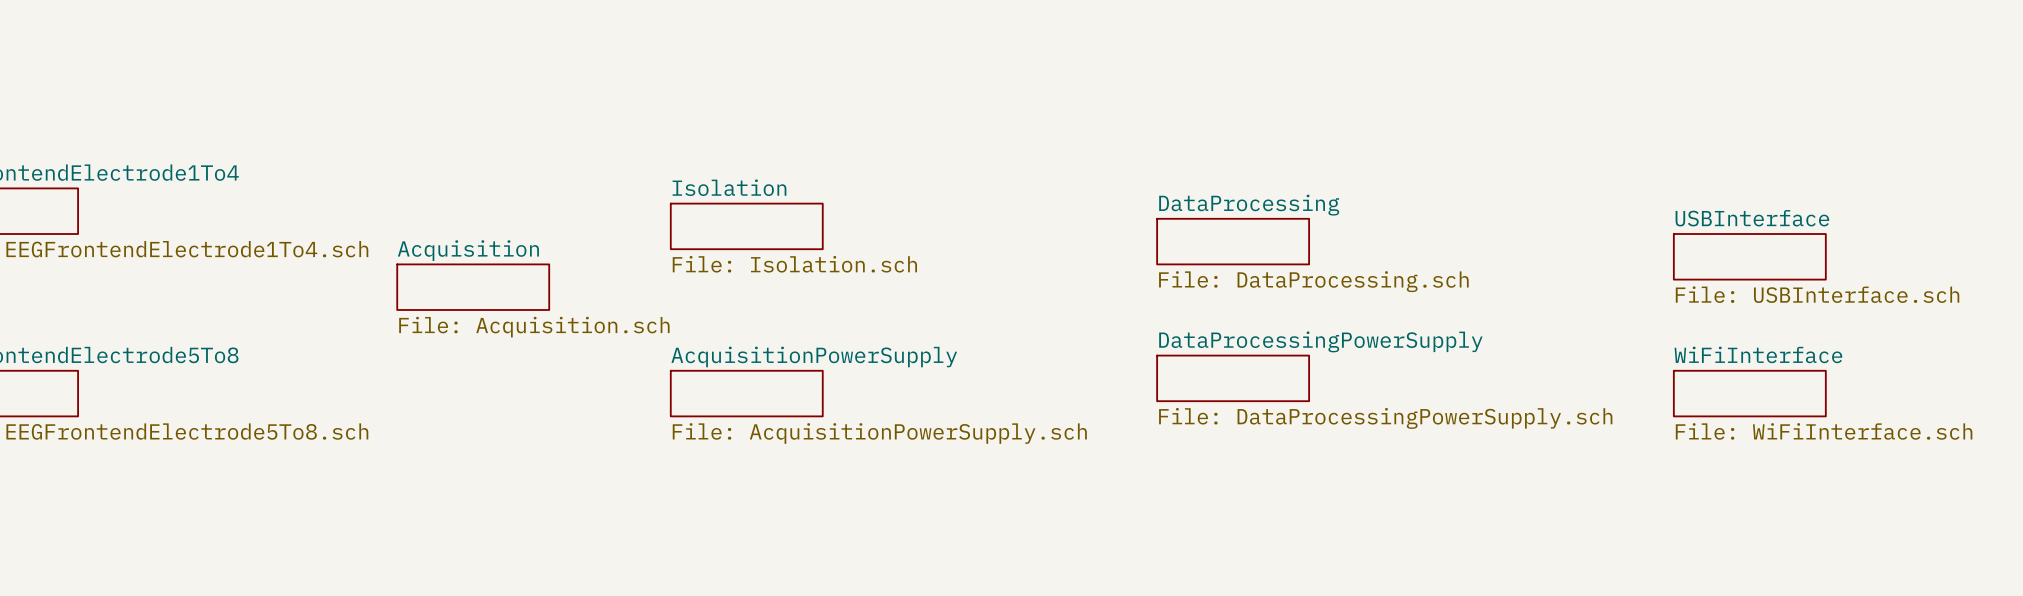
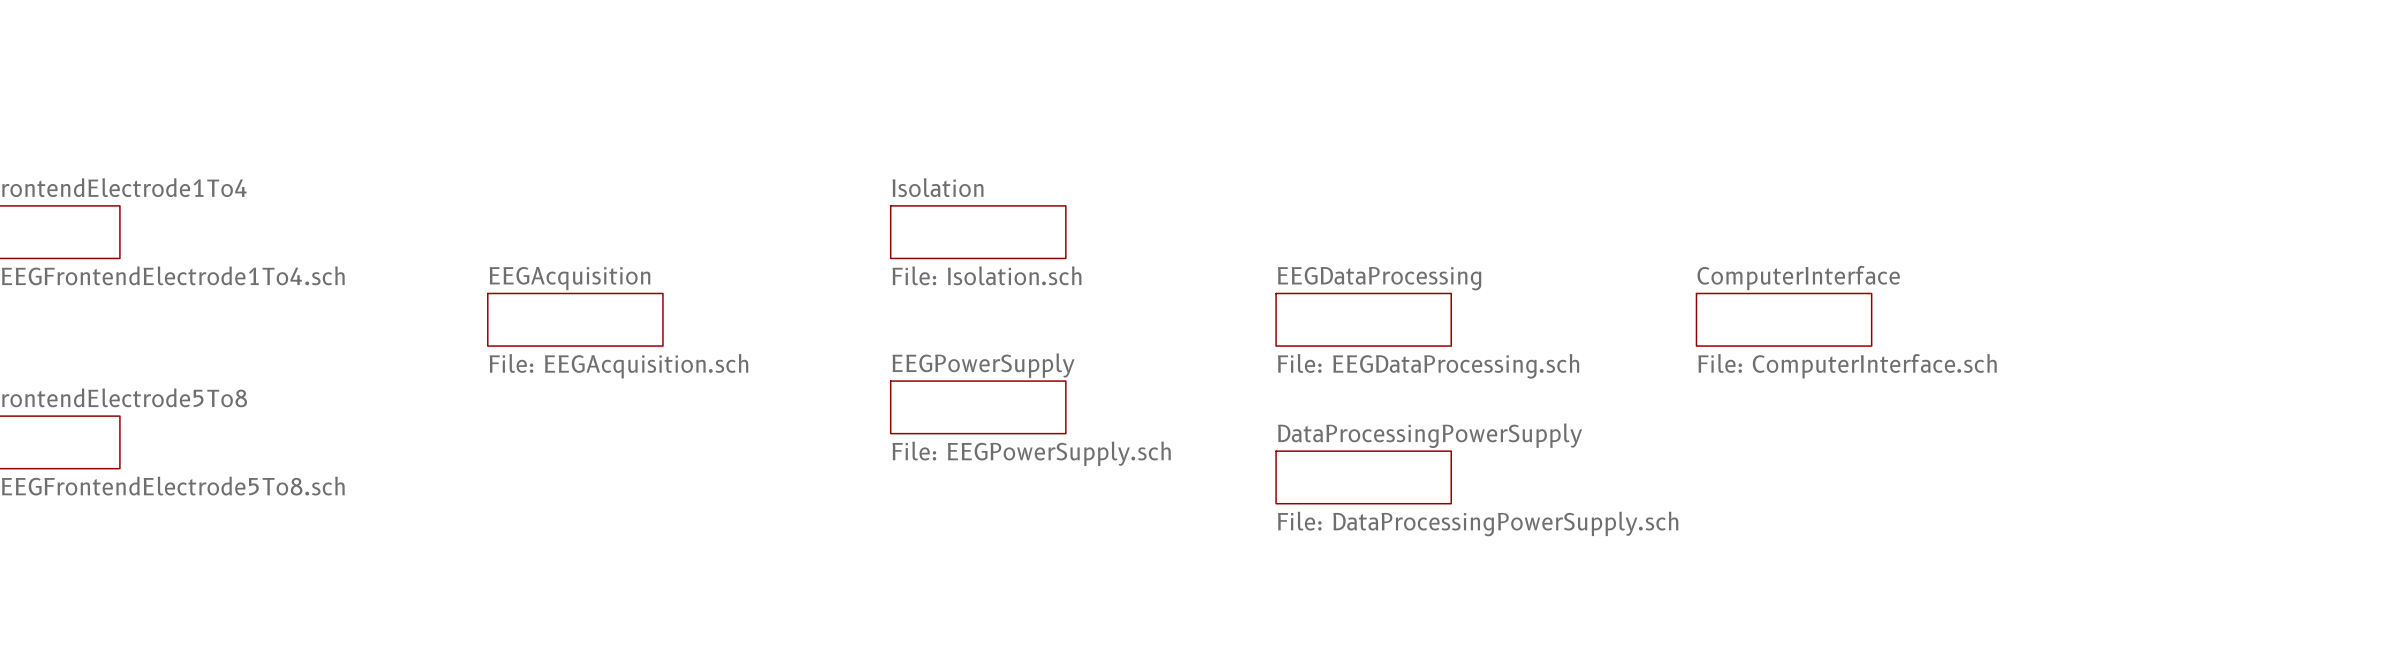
sheet Isolation position: (746, 226) -> (978, 232)
sheet DataProcessing: File: DataProcessing.sch (1233, 241) -> none
sheet Acquisition name: Acquisition (468, 250) -> EEGAcquisition (569, 278)
sheet USBInterface: File: USBInterface.sch (1749, 256) -> none
sheet EEGDataProcessing: none -> File: EEGDataProcessing.sch (1363, 319)
sheet ComputerInterface: none -> File: ComputerInterface.sch (1784, 319)
sheet Acquisition value: File: Acquisition.sch (534, 327) -> File: EEGAcquisition.sch (618, 366)
sheet EEGPowerSupply: none -> File: EEGPowerSupply.sch (978, 407)
sheet DataProcessingPowerSupply position: (1233, 378) -> (1363, 477)
sheet AcquisitionPowerSupply: File: AcquisitionPowerSupply.sch (746, 393) -> none
sheet WiFiInterface: File: WiFiInterface.sch (1749, 393) -> none

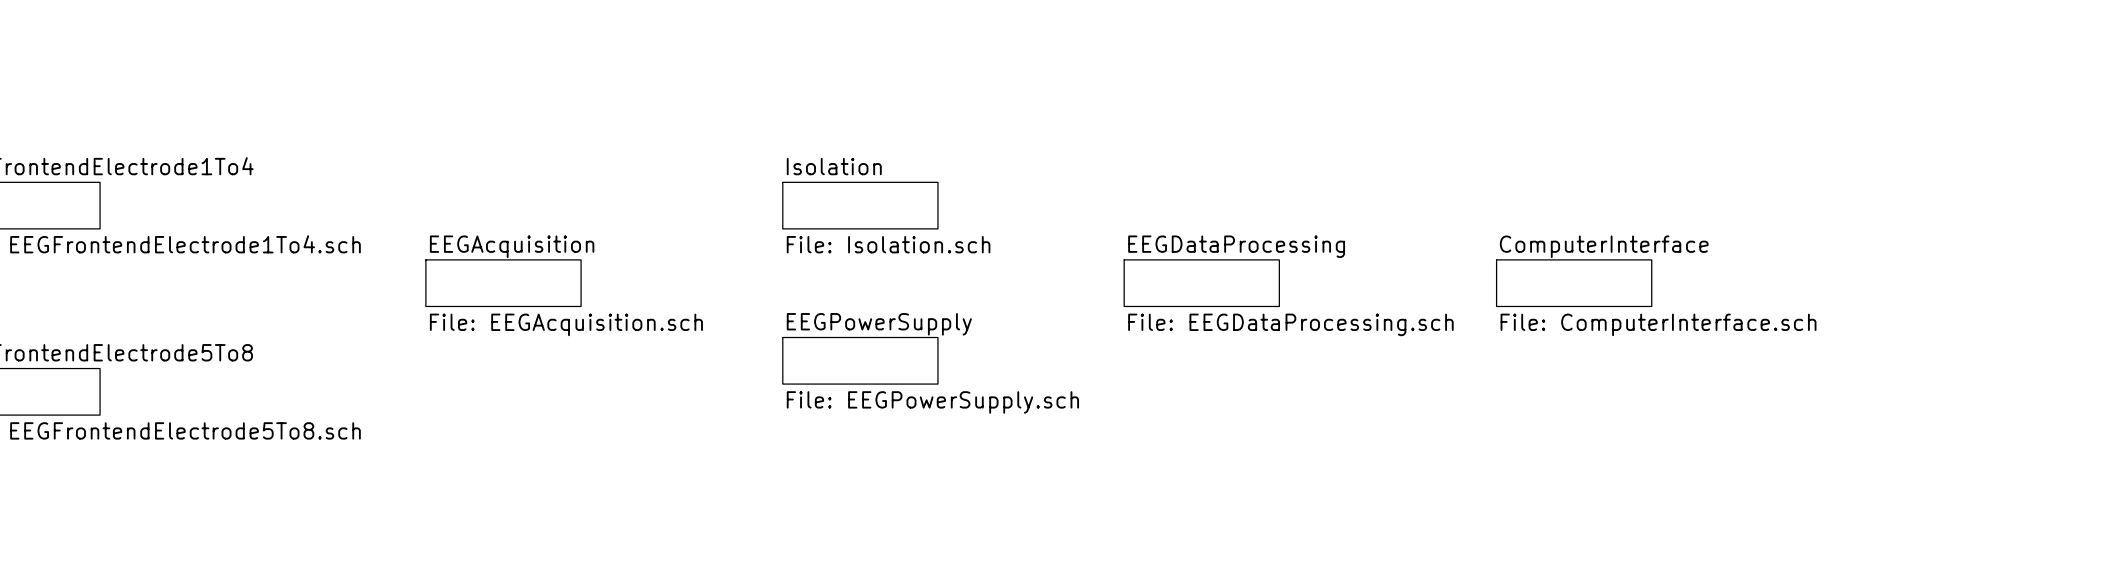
sheet DataProcessingPowerSupply: File: DataProcessingPowerSupply.sch (1363, 477) -> none

